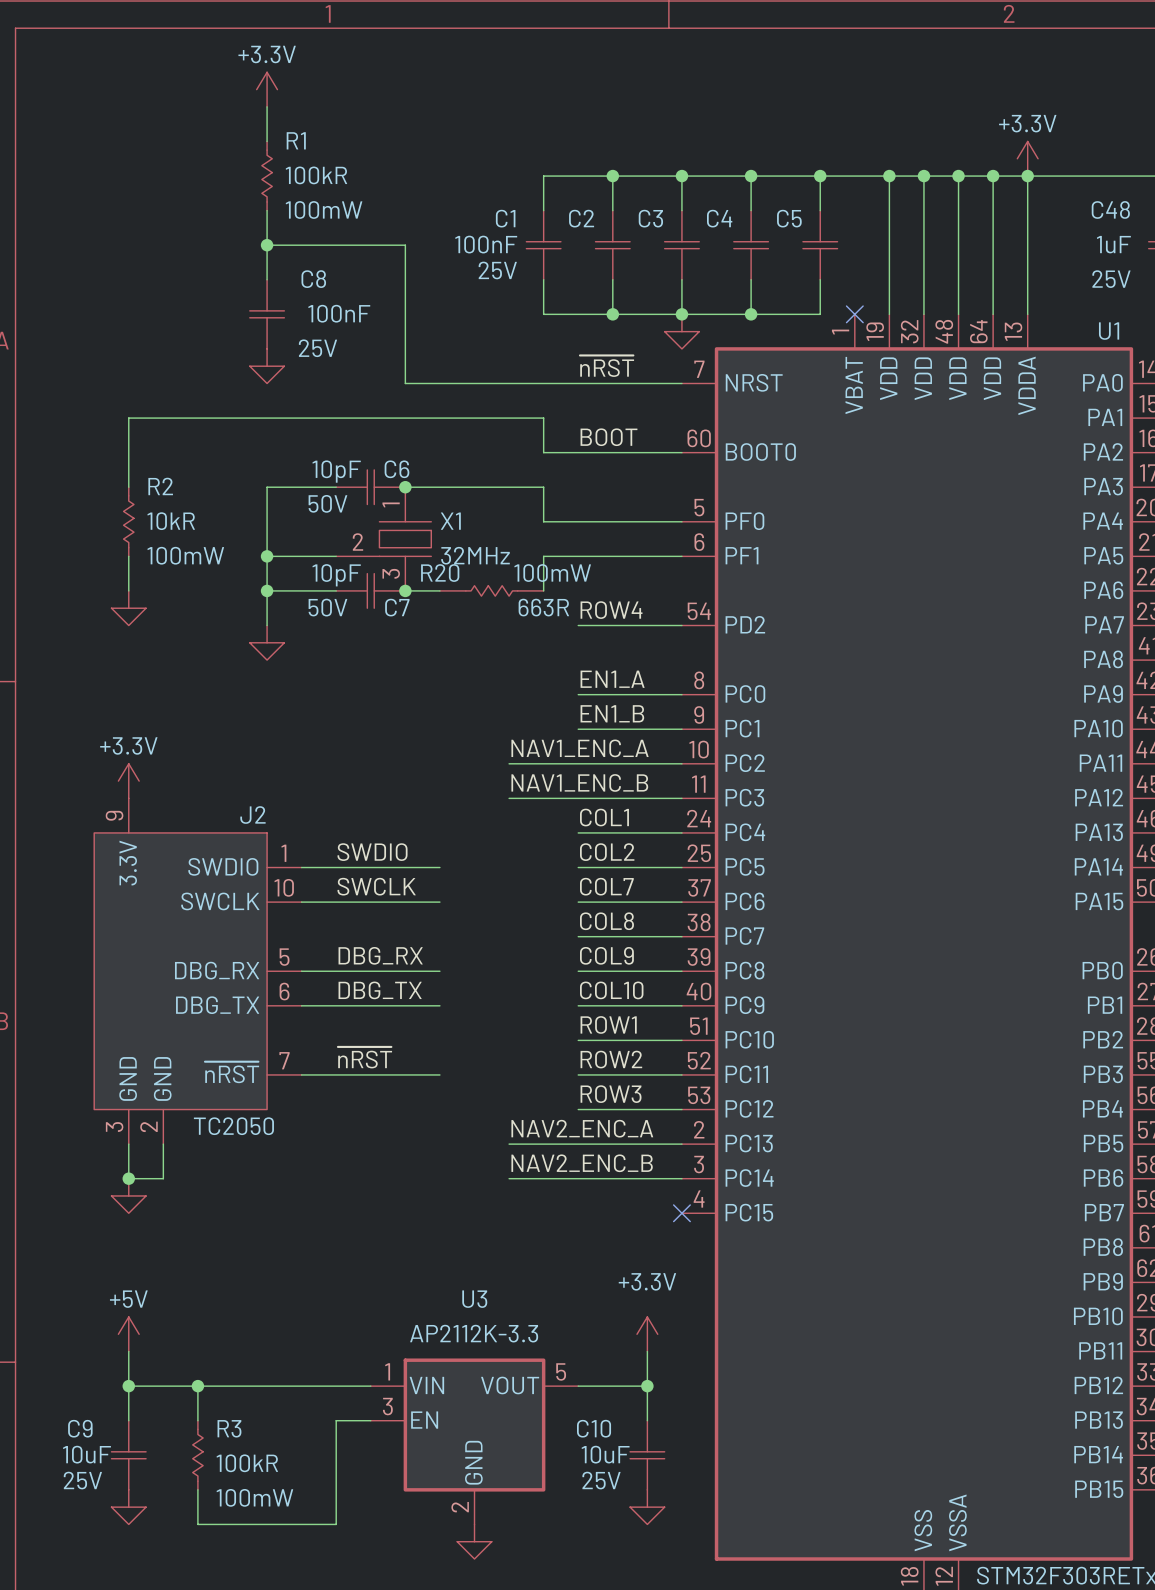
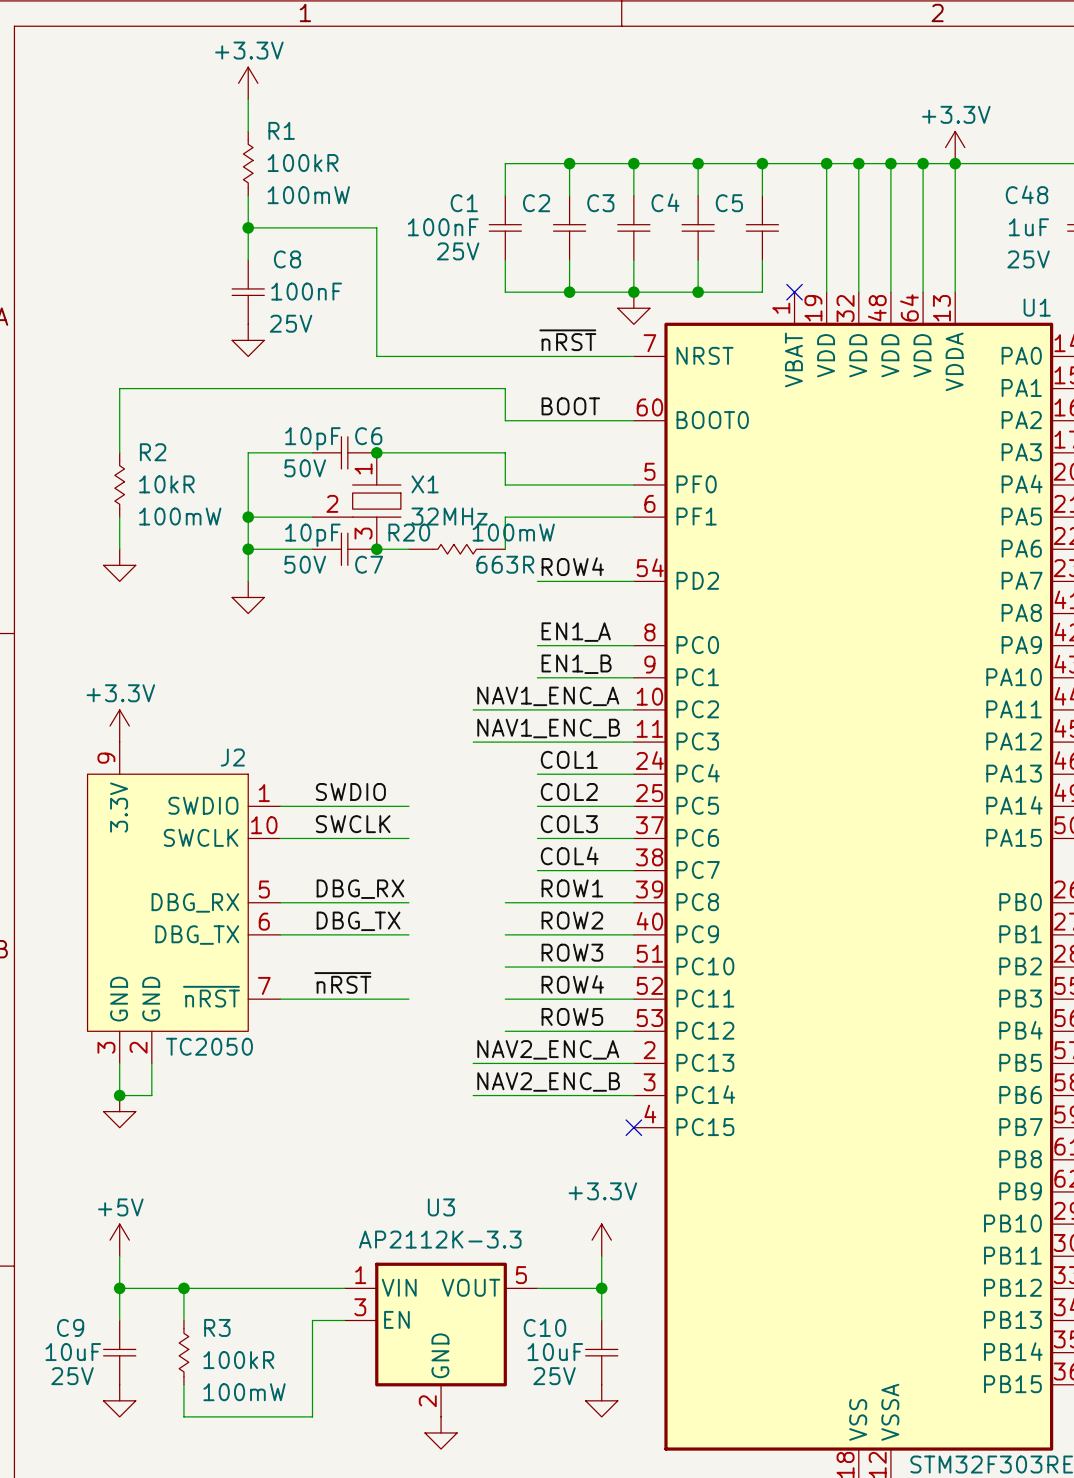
label: COL7 (606, 886) -> COL3 (569, 824)
label: COL8 (606, 921) -> COL4 (569, 855)
label: COL9 (606, 955) -> ROW1 (572, 888)
wire: none -> (505, 902) (537, 902)
label: COL10 (611, 990) -> ROW2 (572, 920)
wire: none -> (505, 934) (537, 934)
label: ROW1 (608, 1024) -> ROW3 (572, 952)
wire: none -> (505, 967) (537, 967)
label: ROW2 (611, 1059) -> ROW4 (572, 984)
wire: none -> (505, 999) (537, 999)
label: ROW3 (611, 1094) -> ROW5 (572, 1016)
wire: none -> (505, 1031) (537, 1031)

